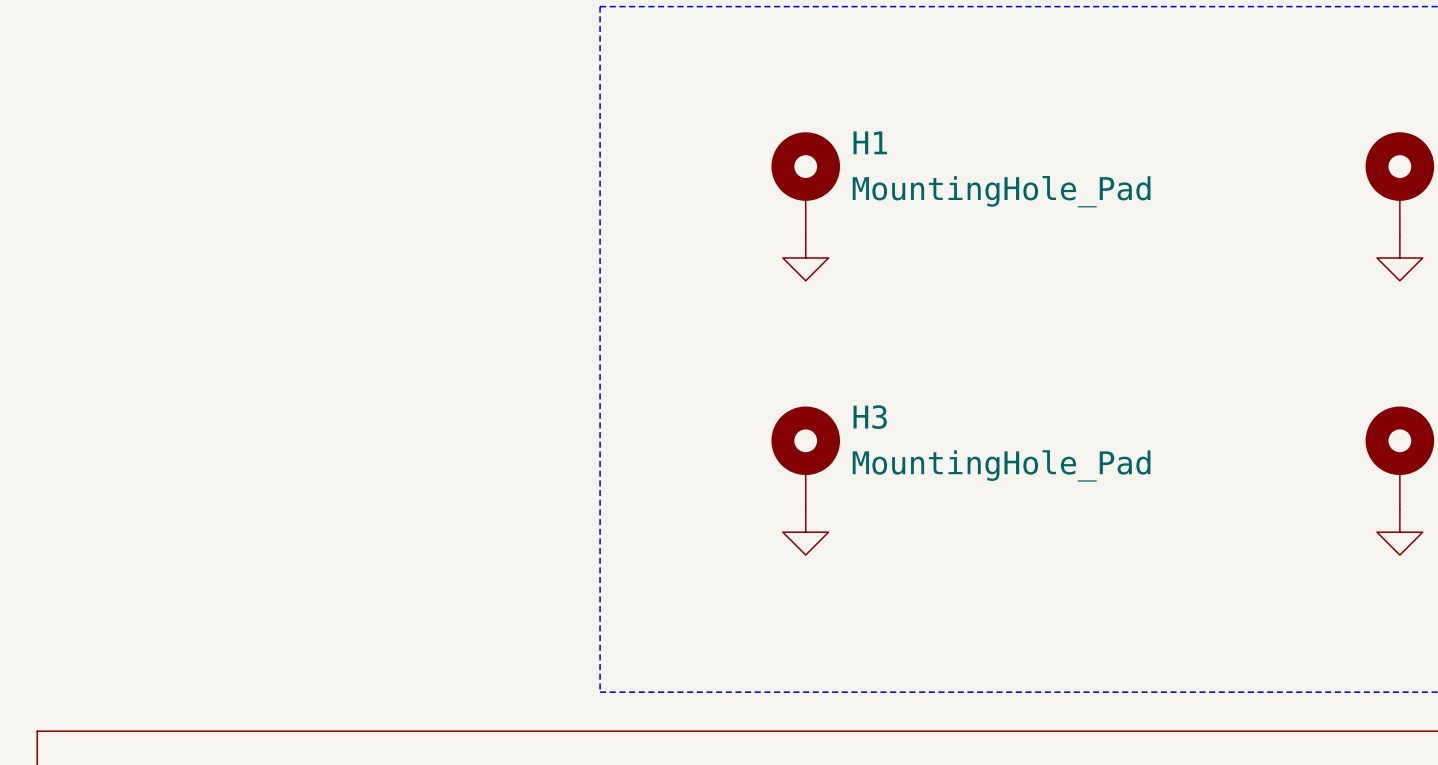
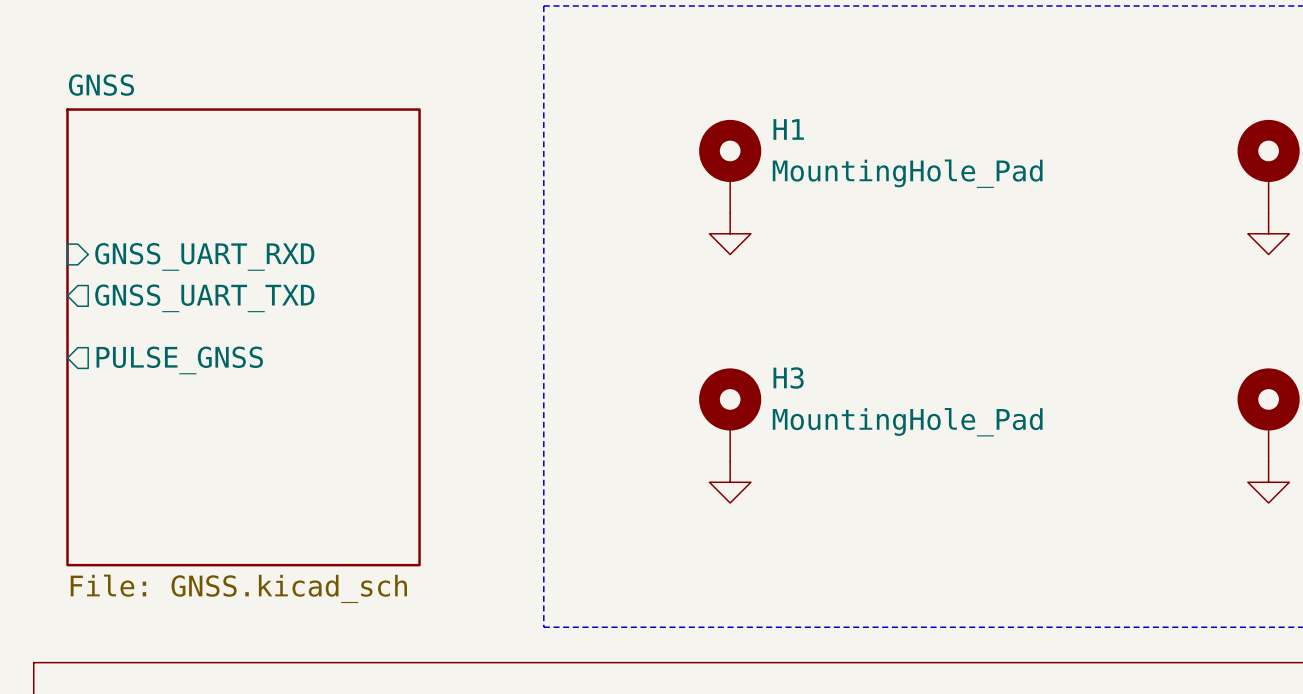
sheet pin: none -> GNSS_UART_RXD (204, 256)
sheet pin: none -> GNSS_UART_TXD (204, 298)
sheet GNSS: none -> File: GNSS.kicad_sch (243, 337)
sheet pin: none -> PULSE_GNSS (179, 360)

